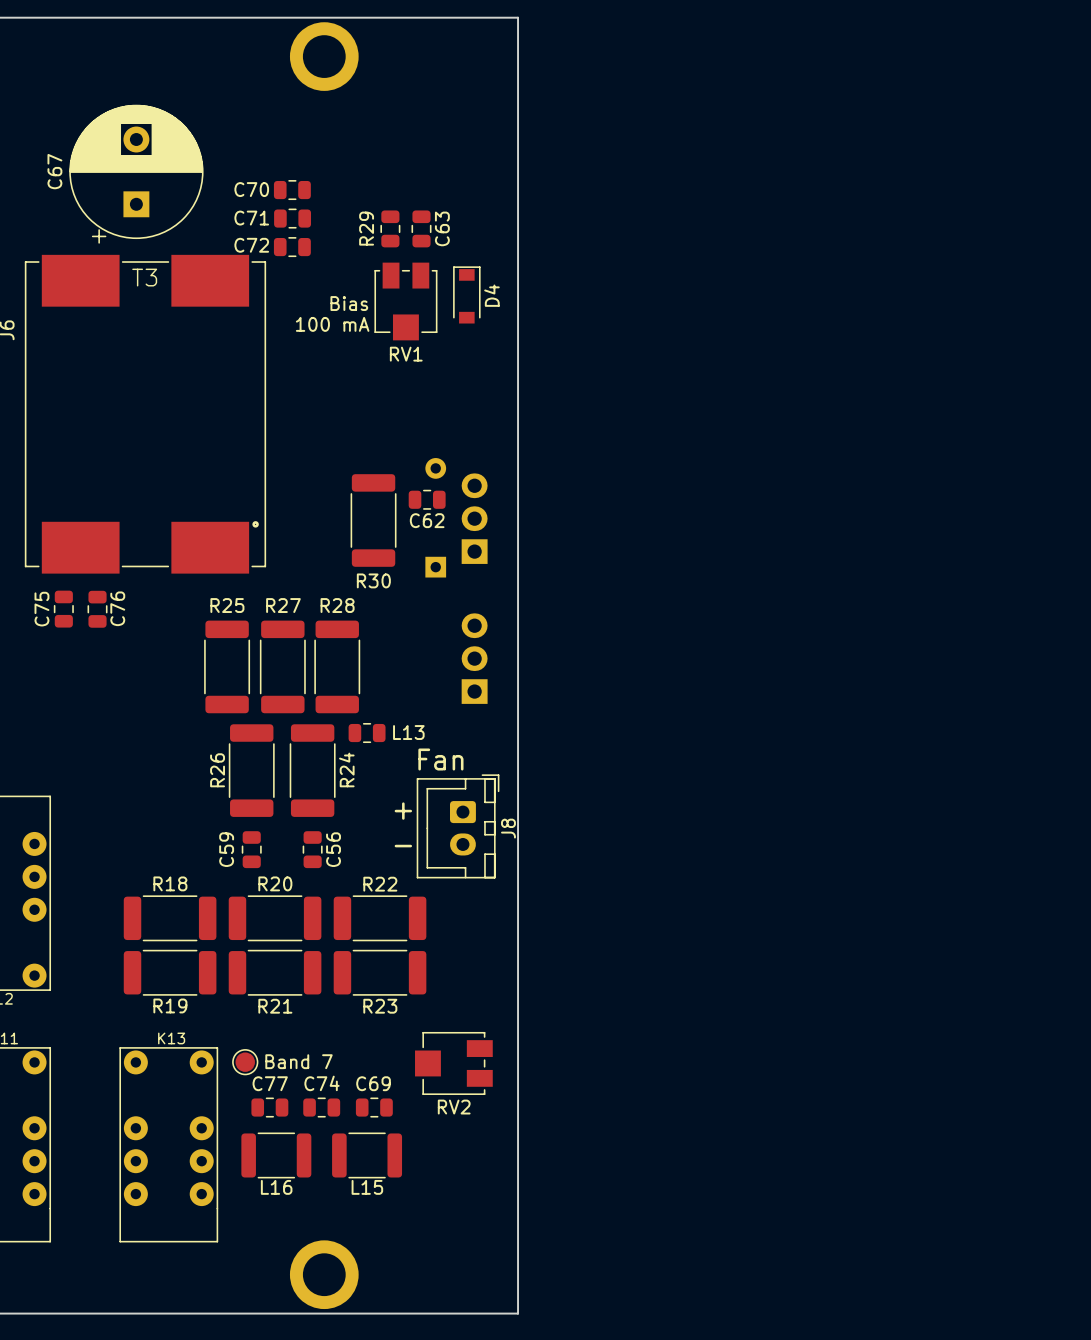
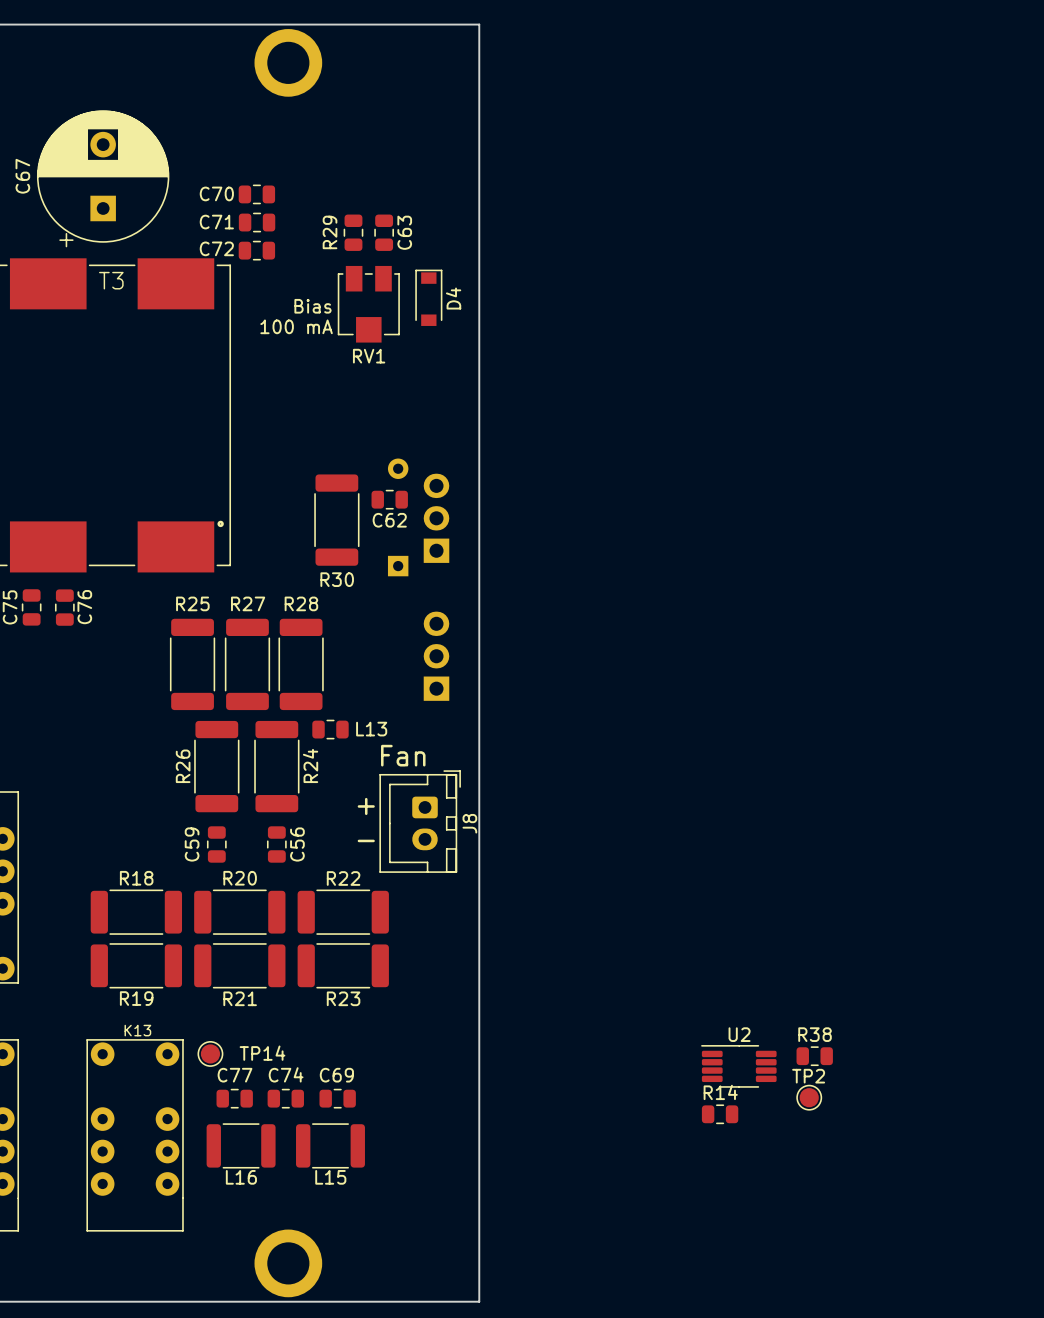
Band 7 name: Band 7 (299, 1061) -> TP14 (262, 1053)
RV2: (453, 1063) -> none
R38: none -> (814, 1056)
U2: none -> (738, 1066)
TP2: none -> (809, 1097)
R14: none -> (720, 1114)

